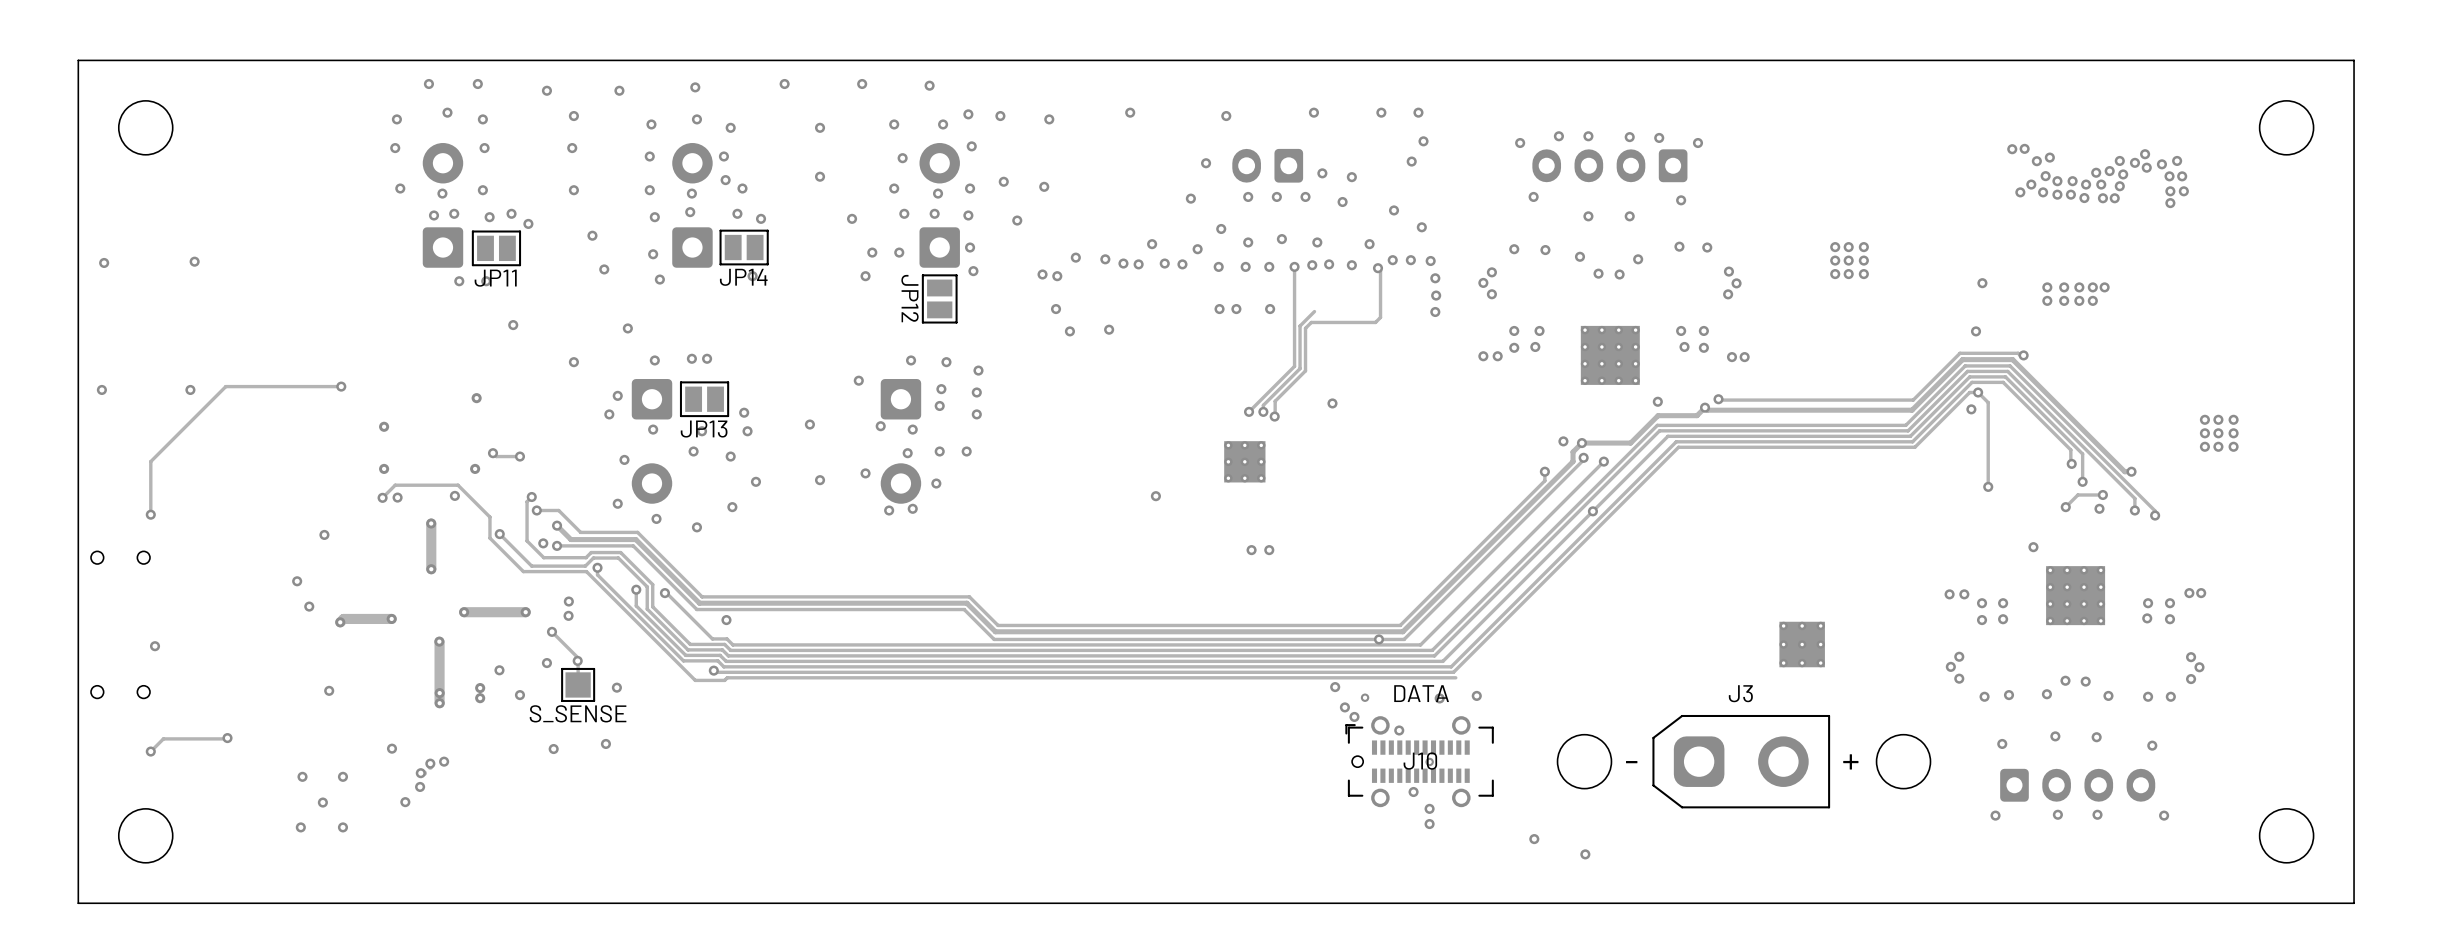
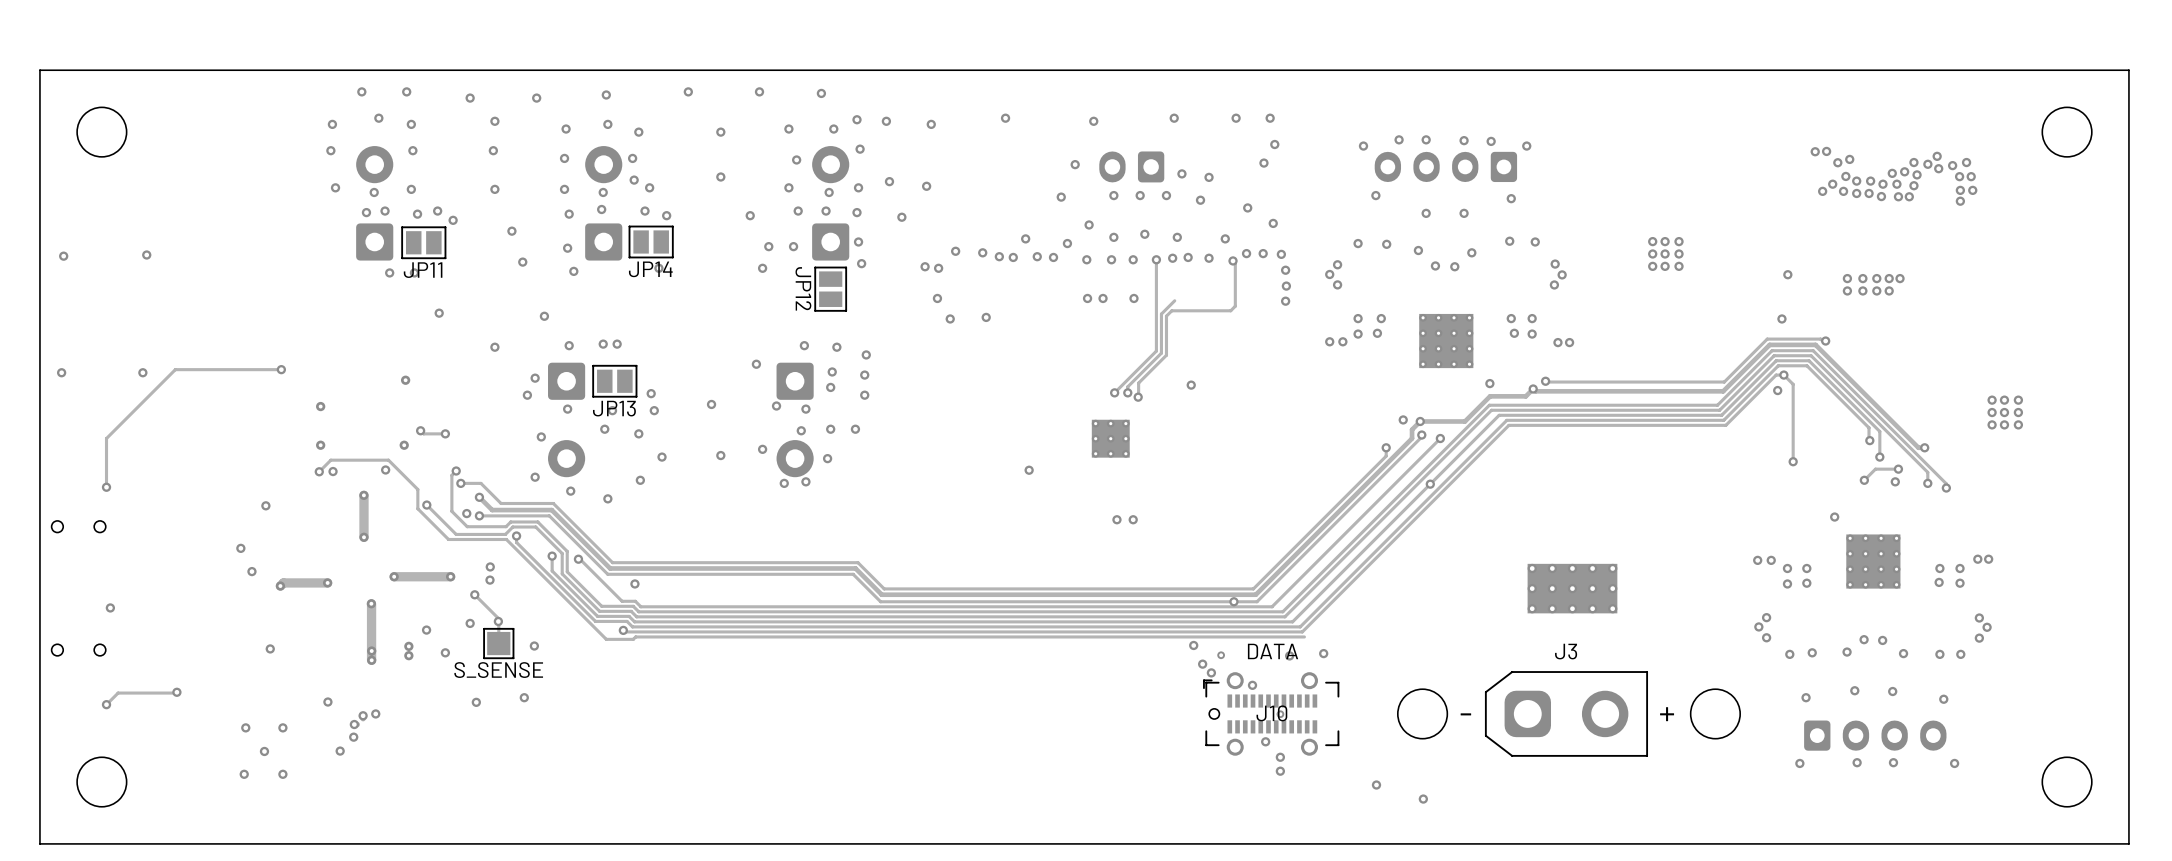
part: none -> (1572, 588)
part: (1802, 644) -> none

